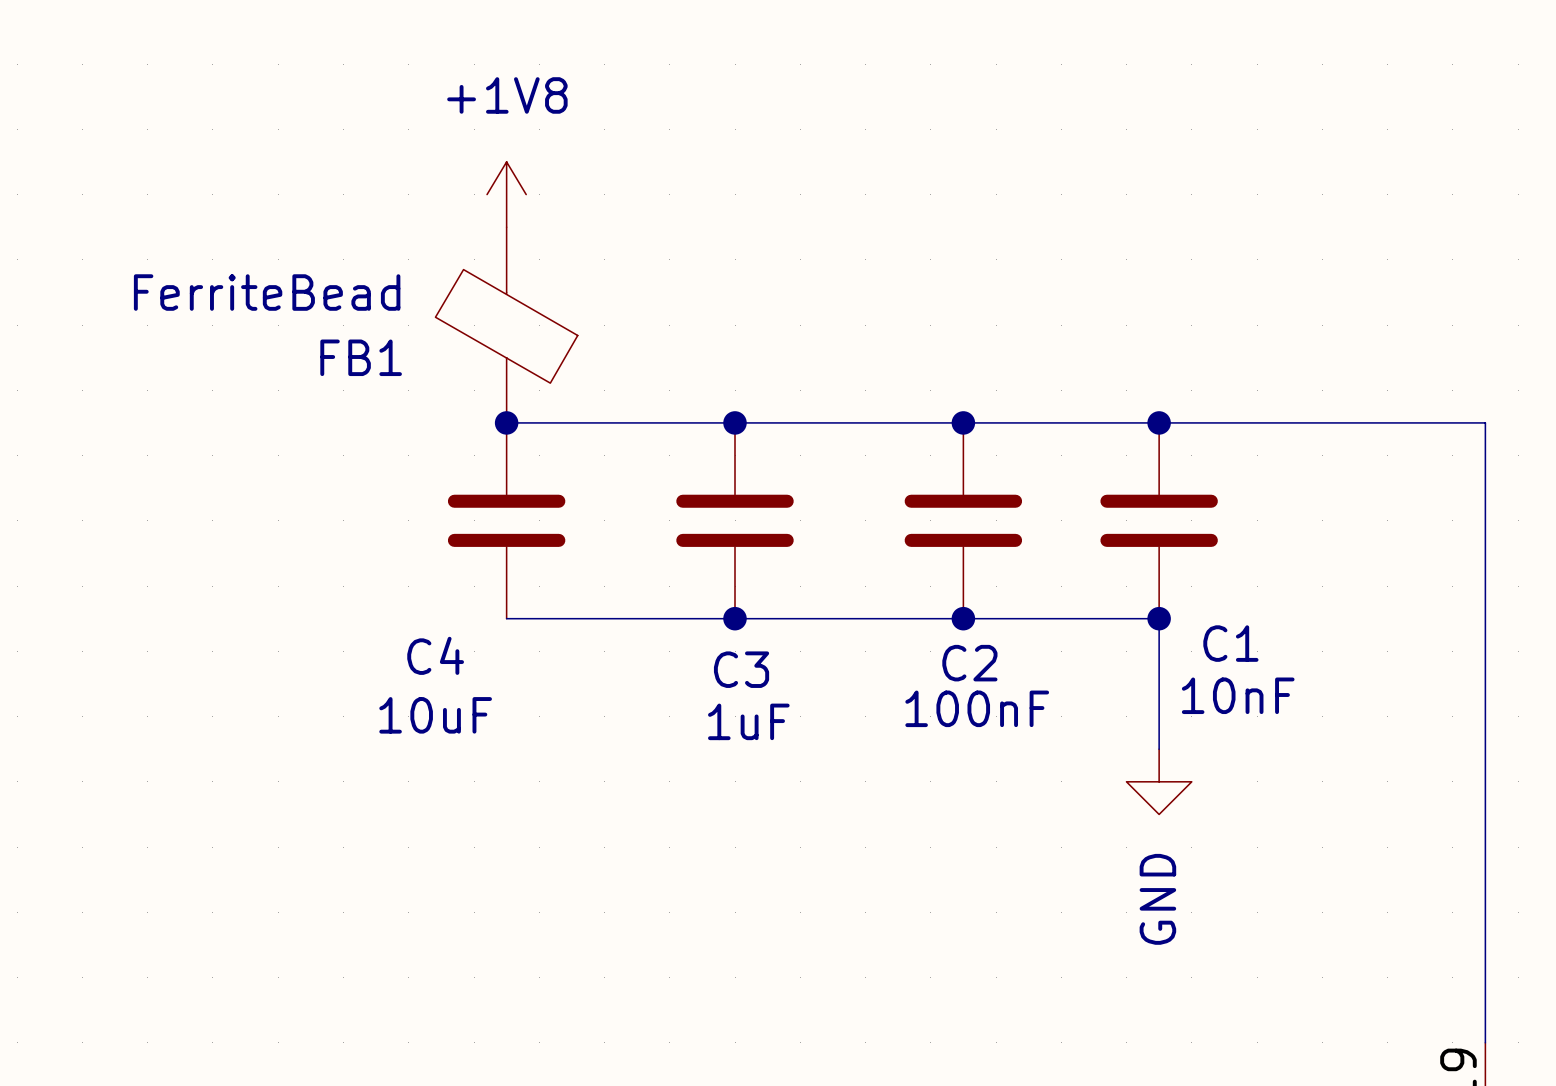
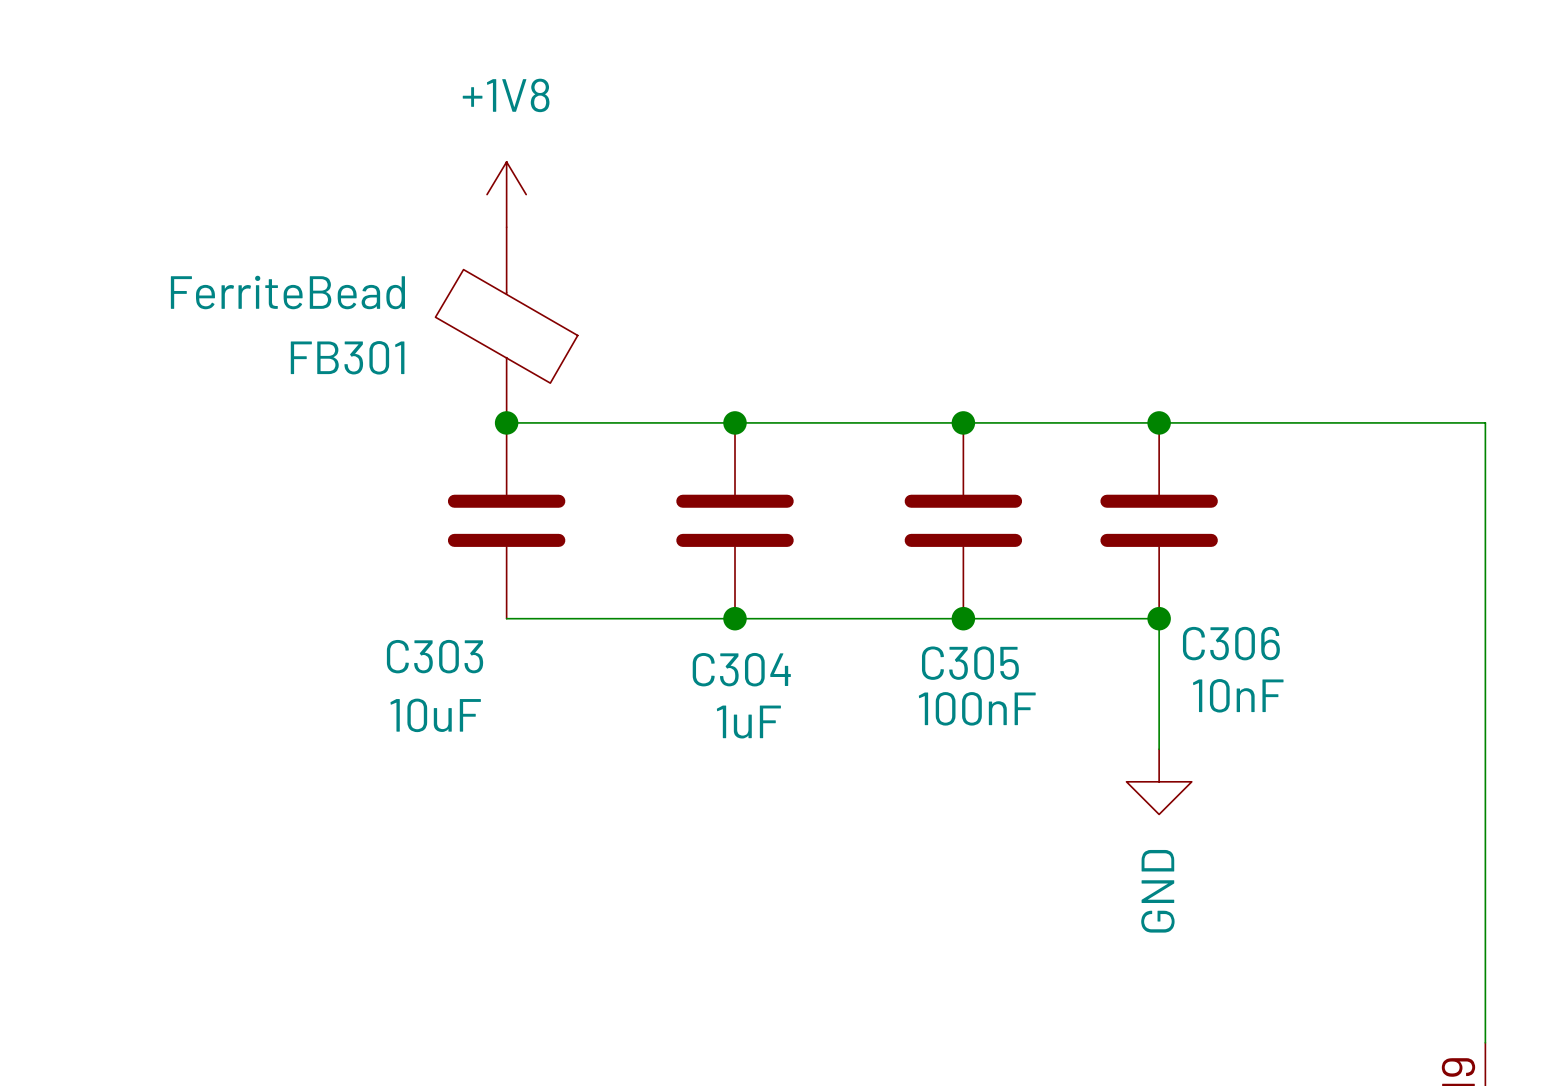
FB1 name: FB1 (361, 357) -> FB301 (347, 357)
C1 name: C1 (1230, 643) -> C306 (1231, 643)
C4 name: C4 (435, 655) -> C303 (435, 656)
C2 name: C2 (969, 663) -> C305 (970, 663)
C3 name: C3 (741, 669) -> C304 (741, 669)

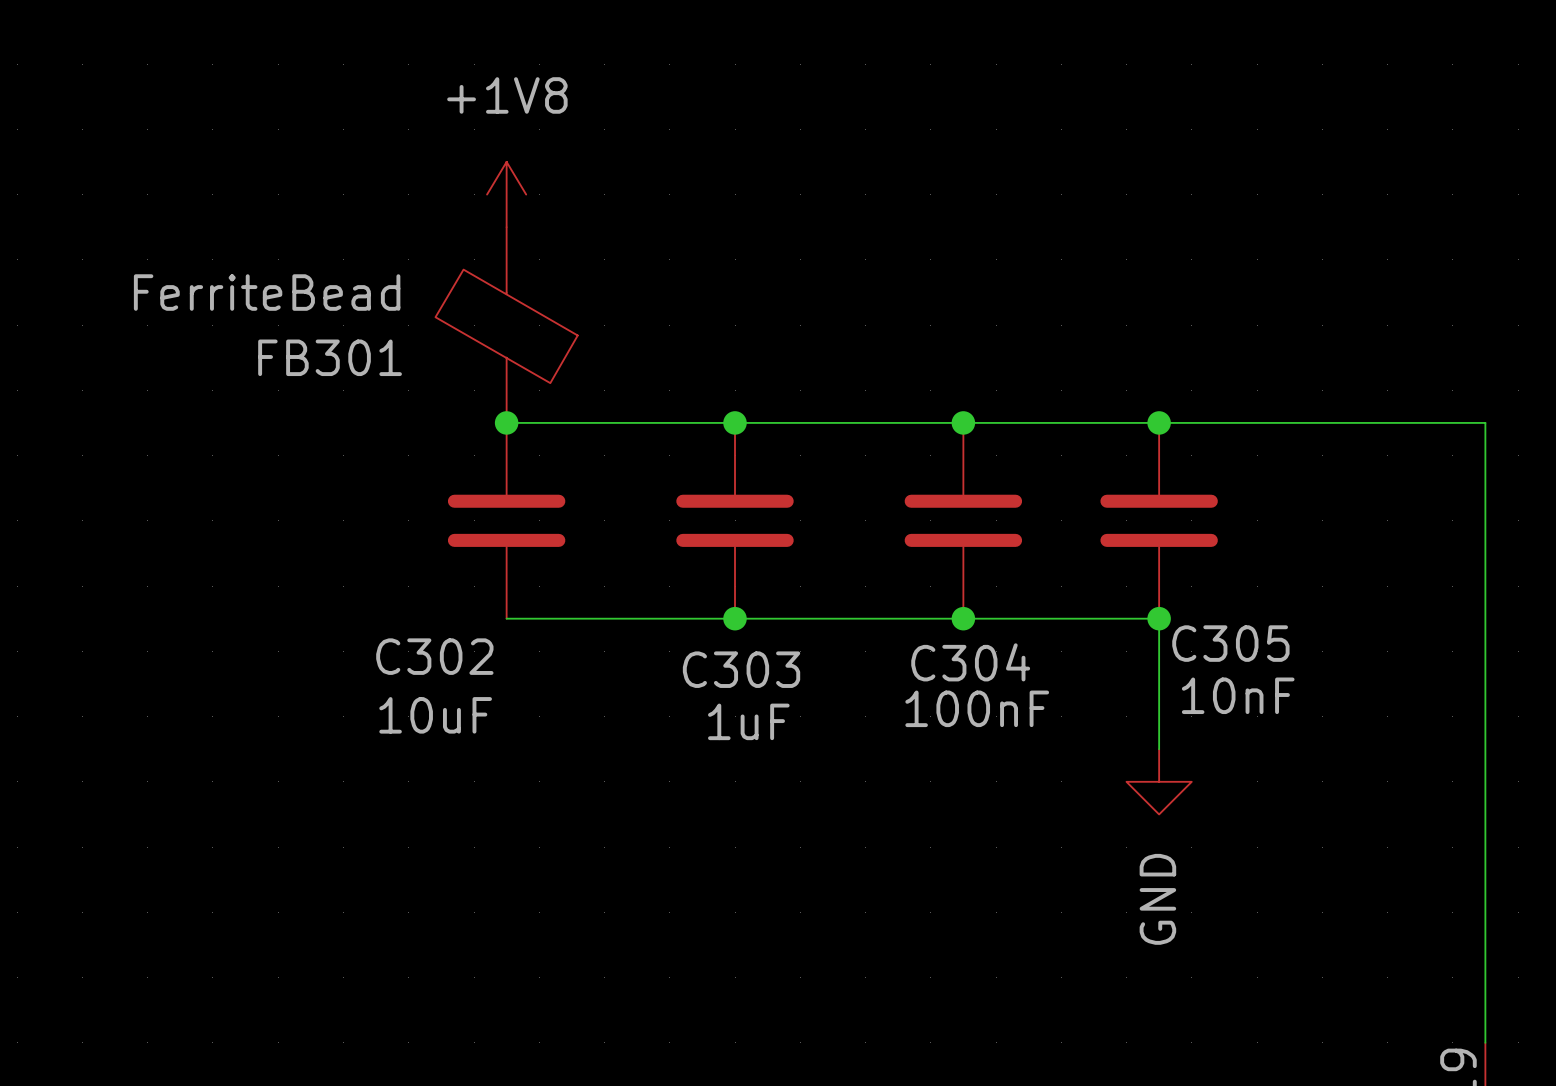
C306 name: C306 (1231, 643) -> C305 (1230, 643)
C303 name: C303 (435, 656) -> C302 (434, 656)
C305 name: C305 (970, 663) -> C304 (970, 662)
C304 name: C304 (741, 669) -> C303 (741, 669)

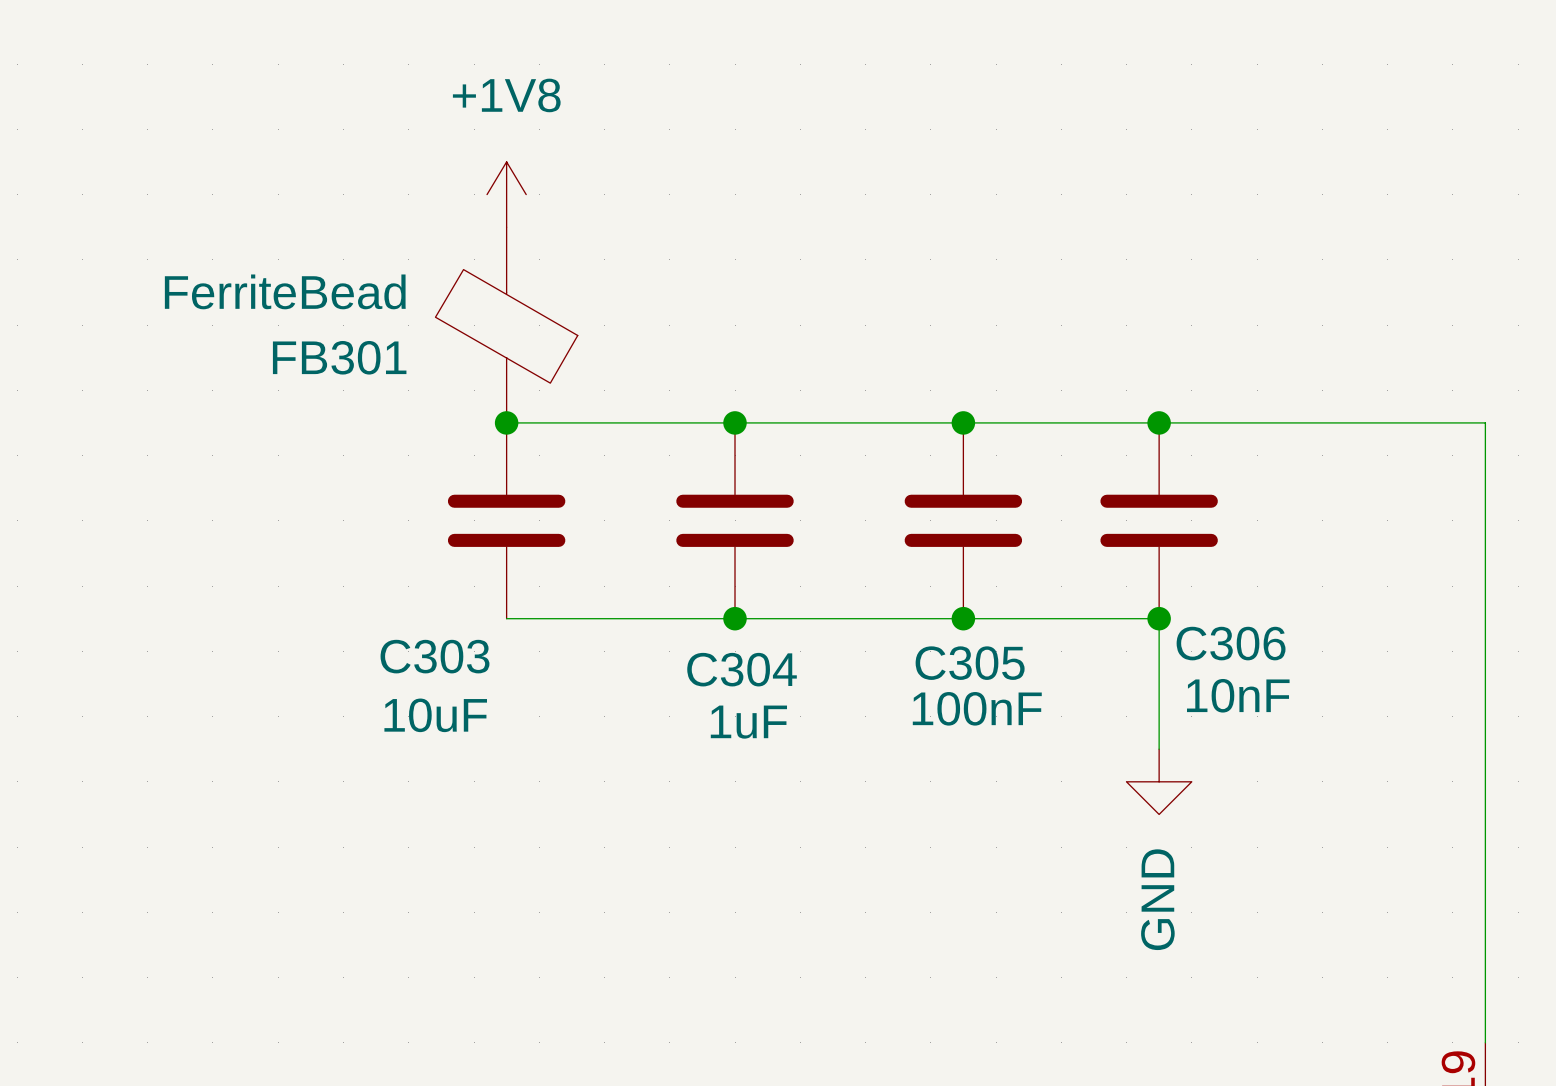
C305 name: C305 (1230, 643) -> C306 (1231, 643)
C302 name: C302 (434, 656) -> C303 (435, 656)
C304 name: C304 (970, 662) -> C305 (970, 663)
C303 name: C303 (741, 669) -> C304 (742, 669)

